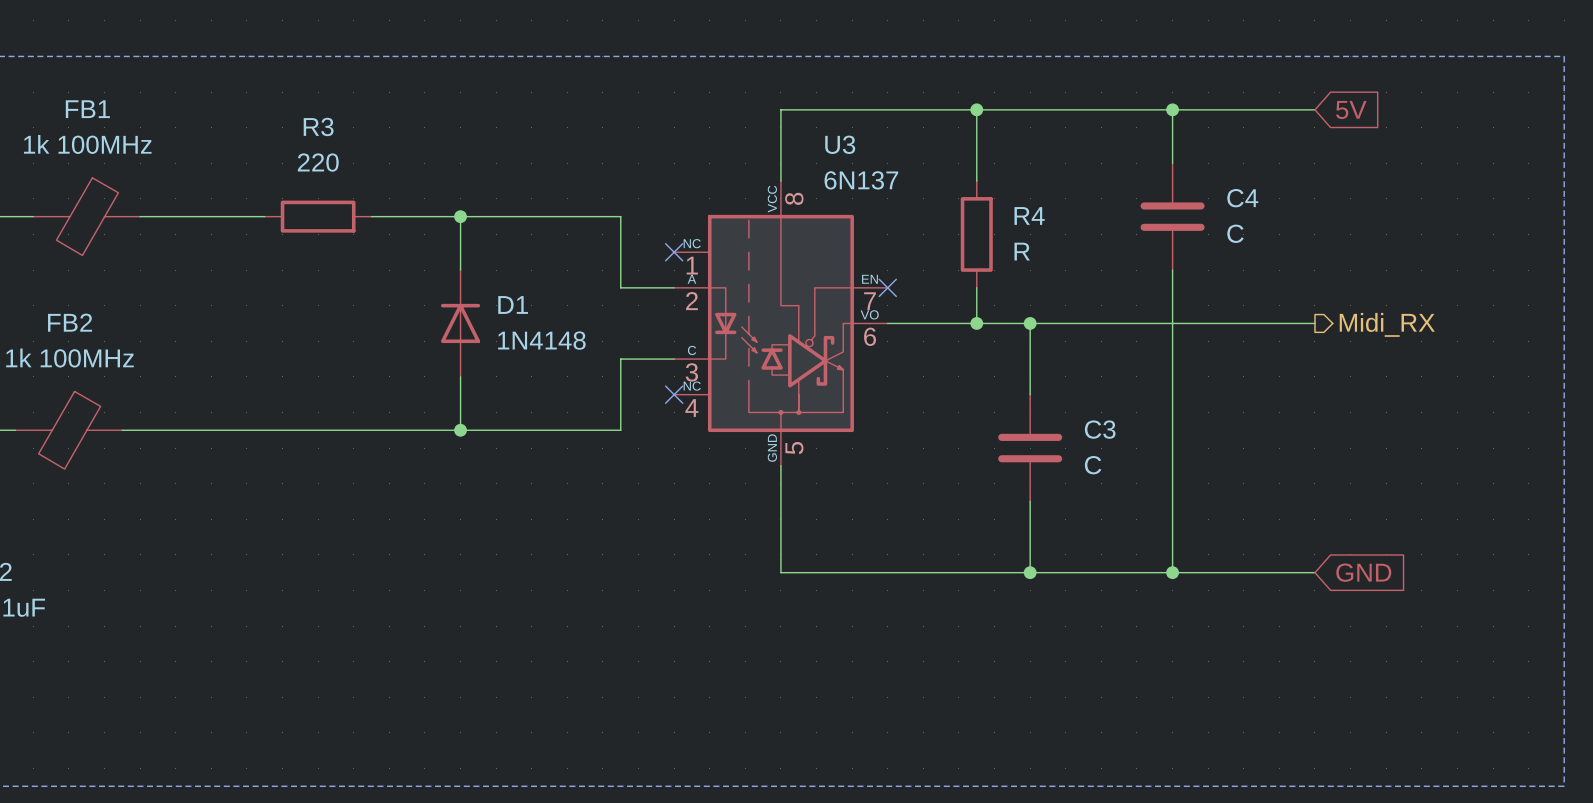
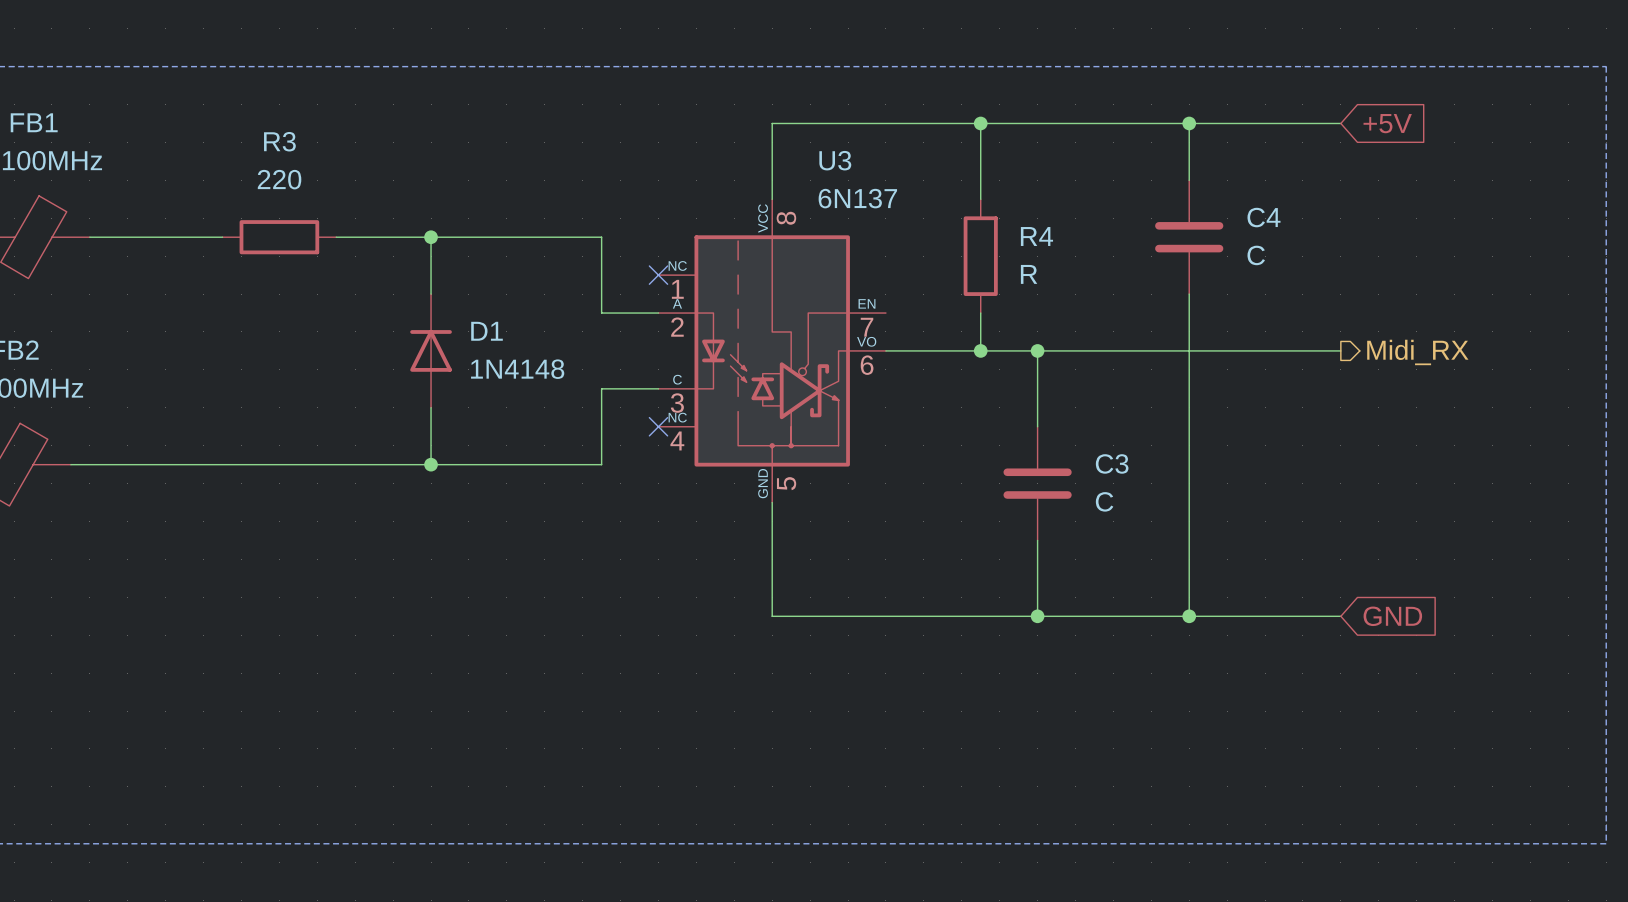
global label: 5V (1351, 109) -> +5V (1387, 123)
no-connect mark: (887, 287) -> none

